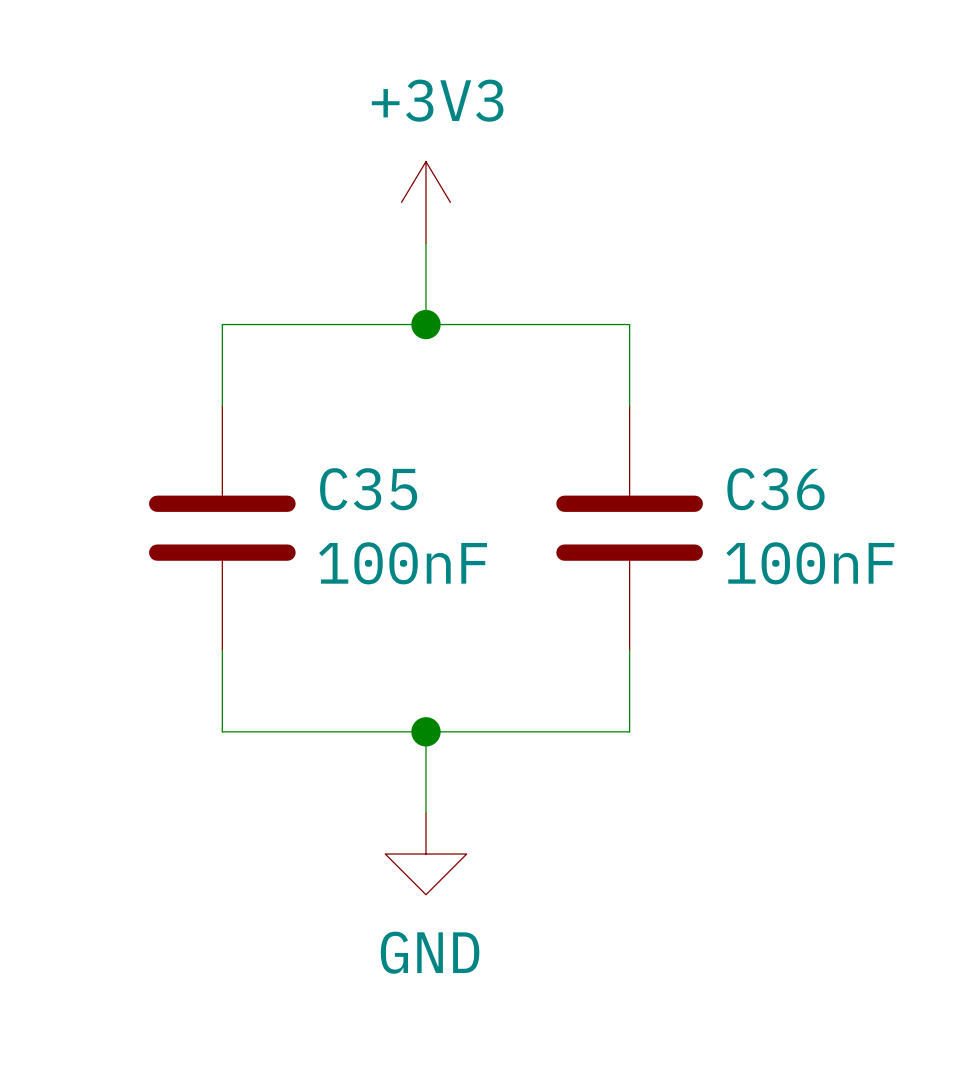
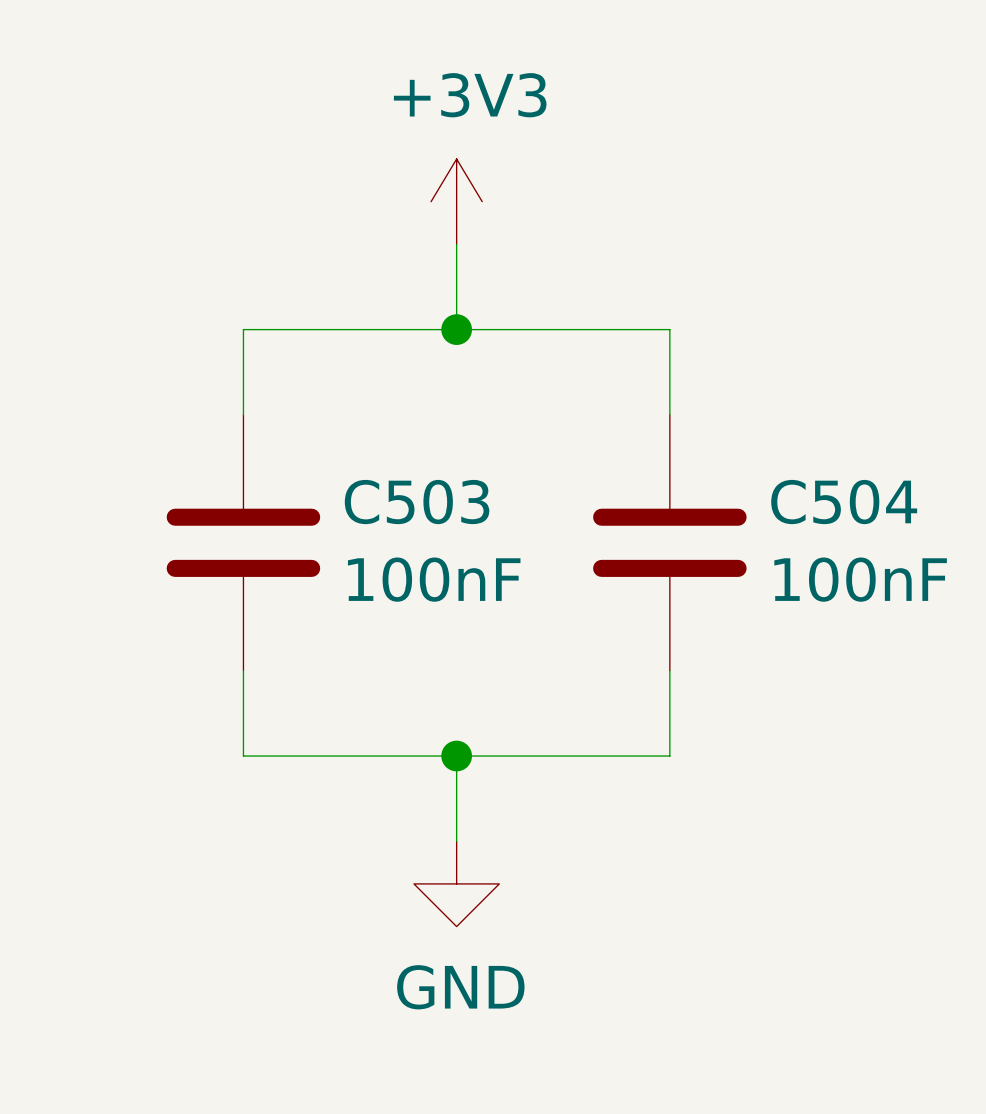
C35 name: C35 (368, 489) -> C503 (417, 502)
C36 name: C36 (775, 489) -> C504 (844, 502)

